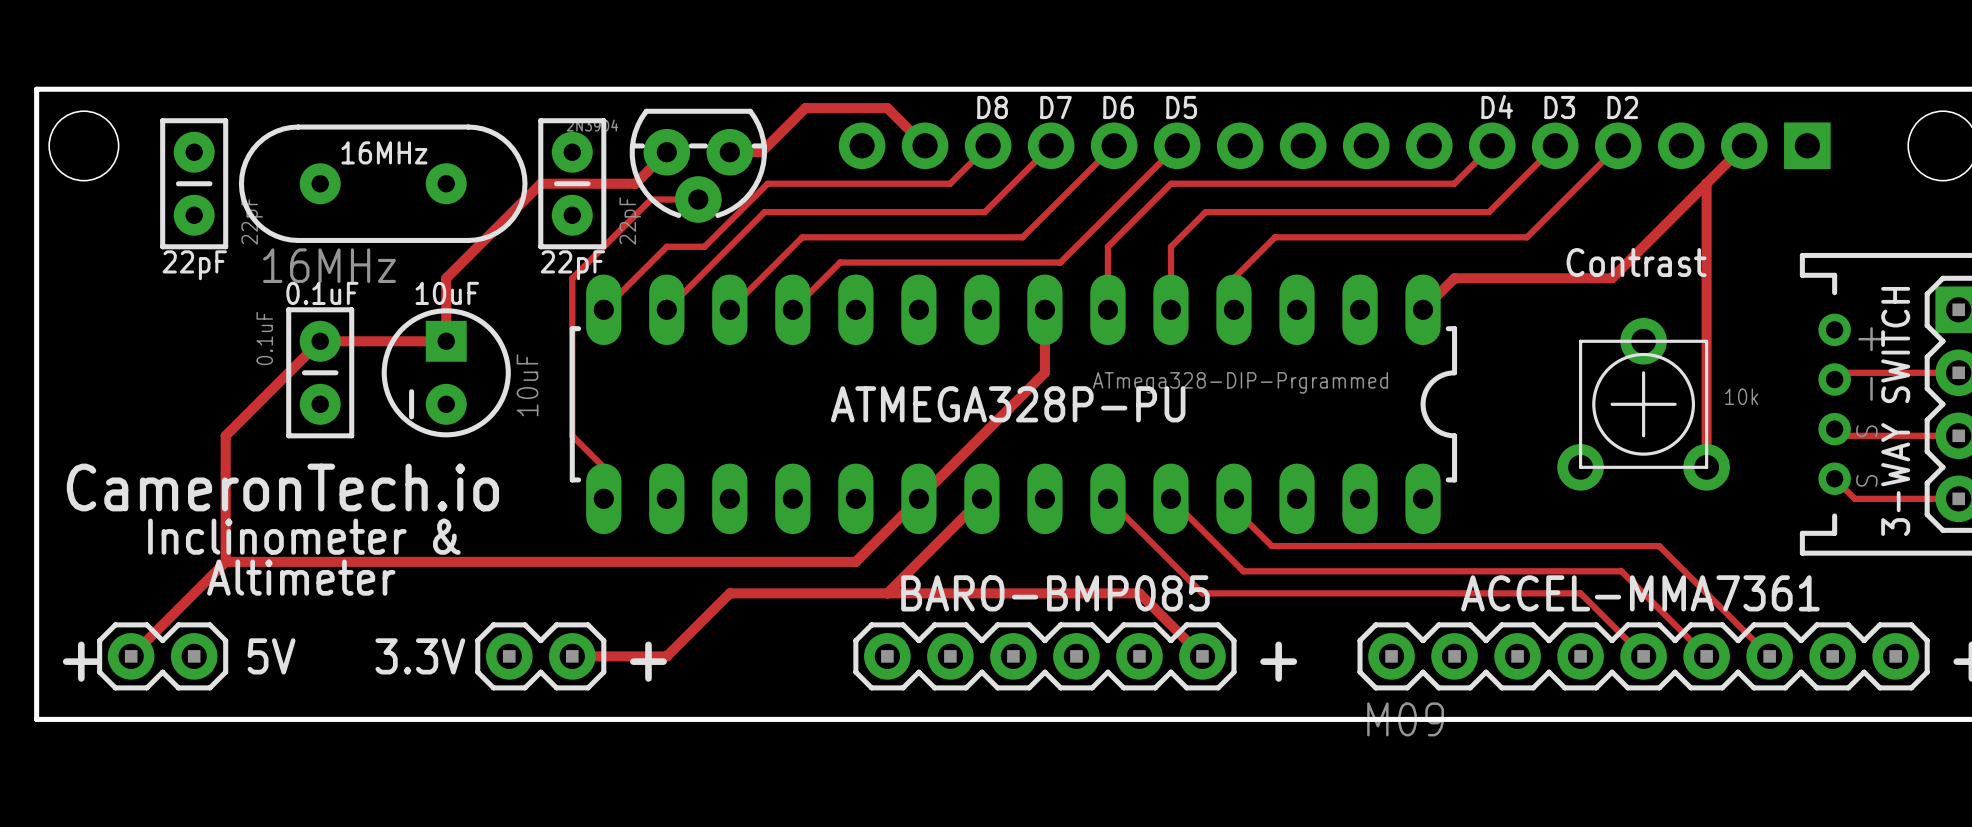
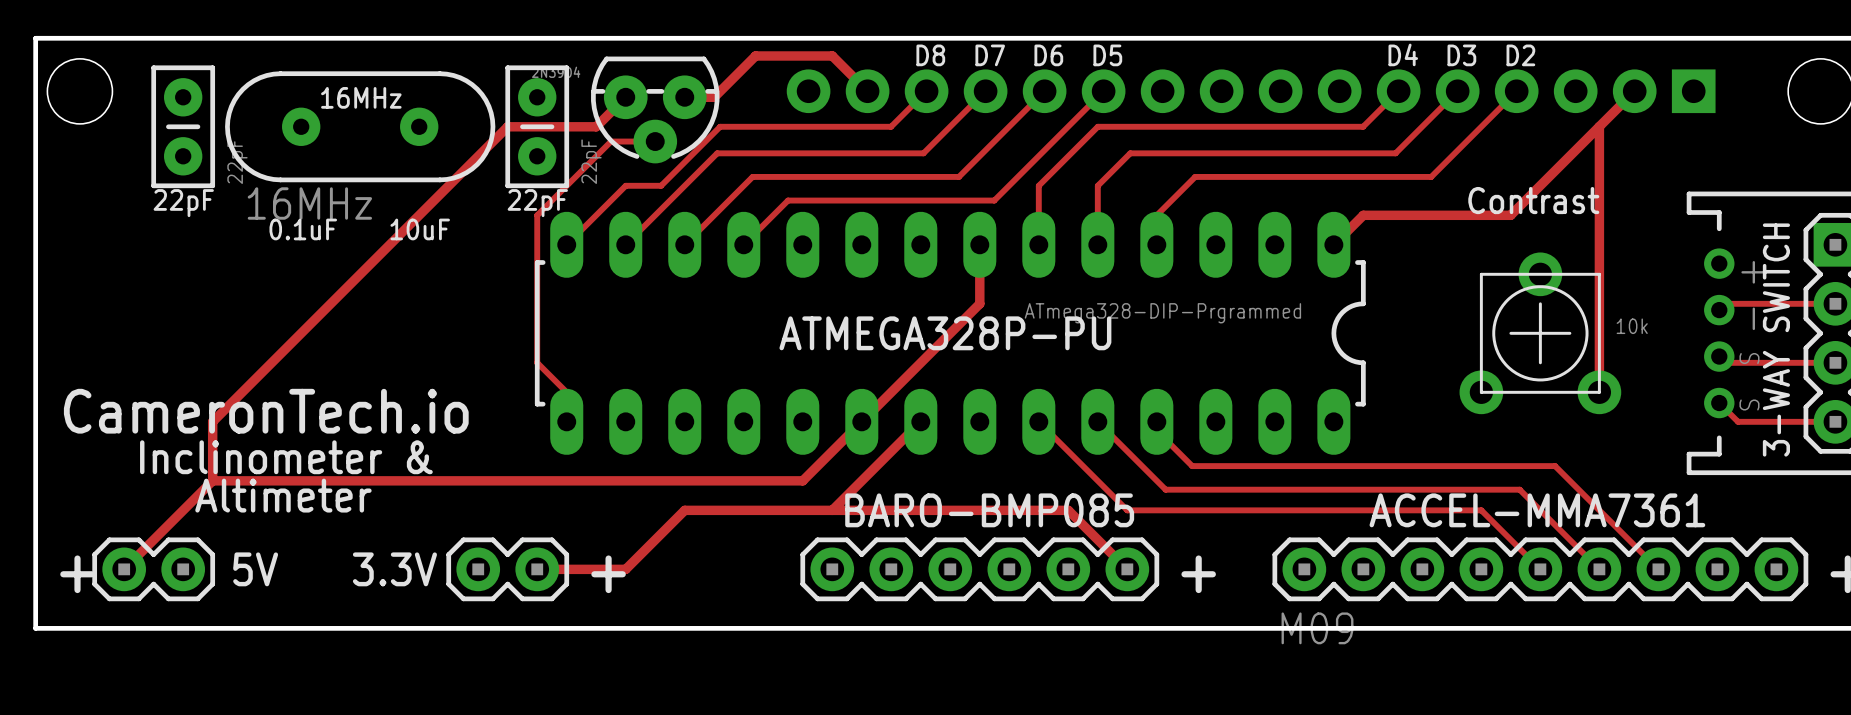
track: (446, 278) (446, 341) (320, 341) (225, 435) (225, 498) -> (419, 215) (212, 421)
part: 0.1uF (320, 372) -> none
part: 10uF (446, 372) -> none

